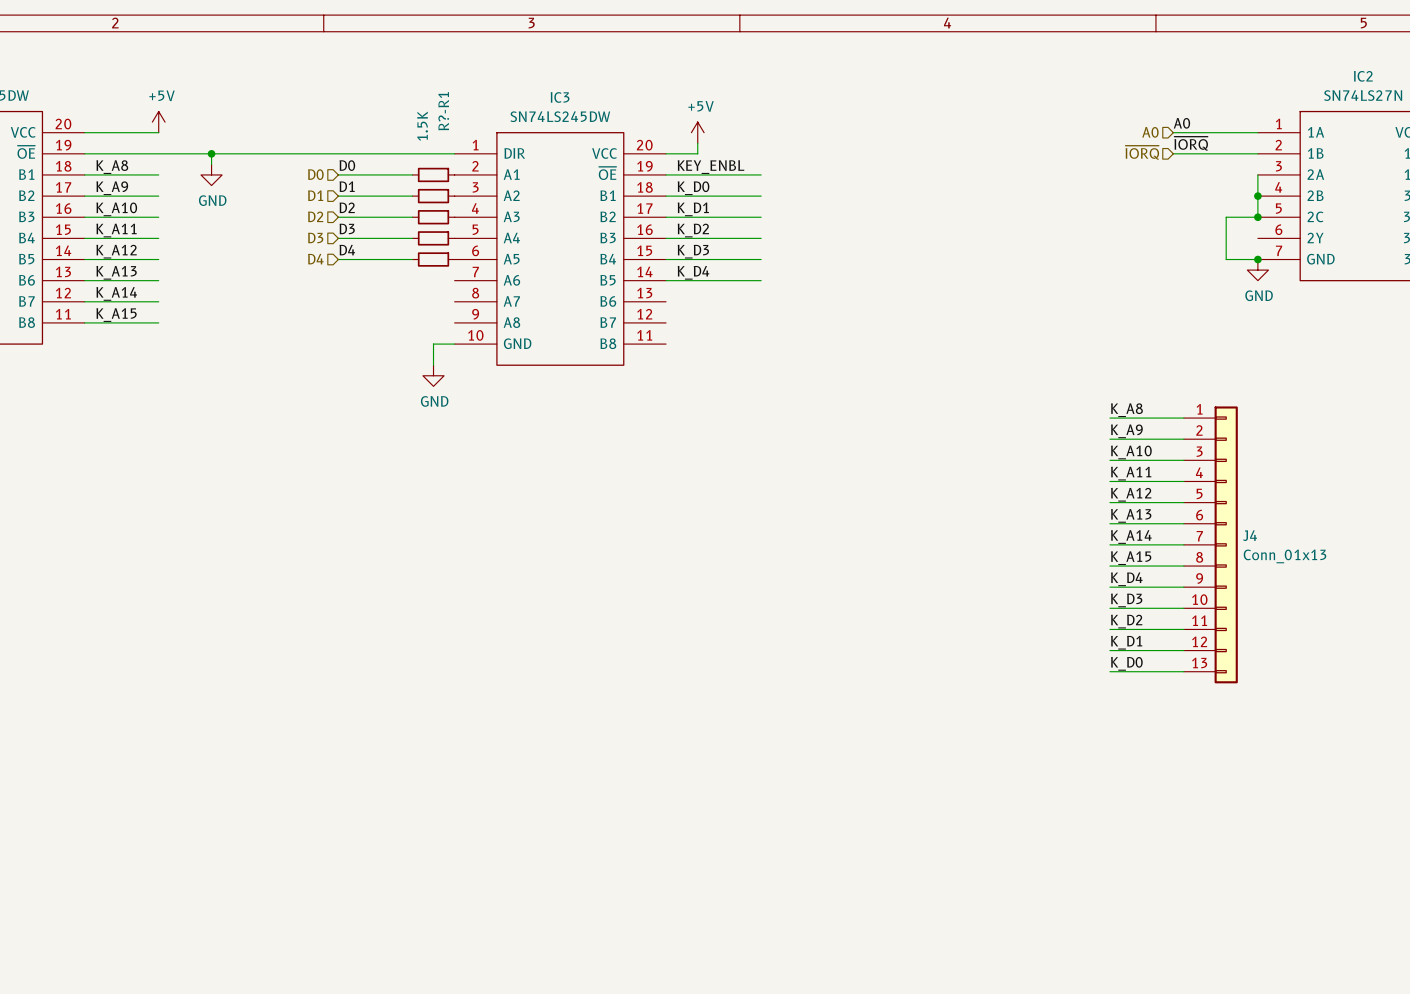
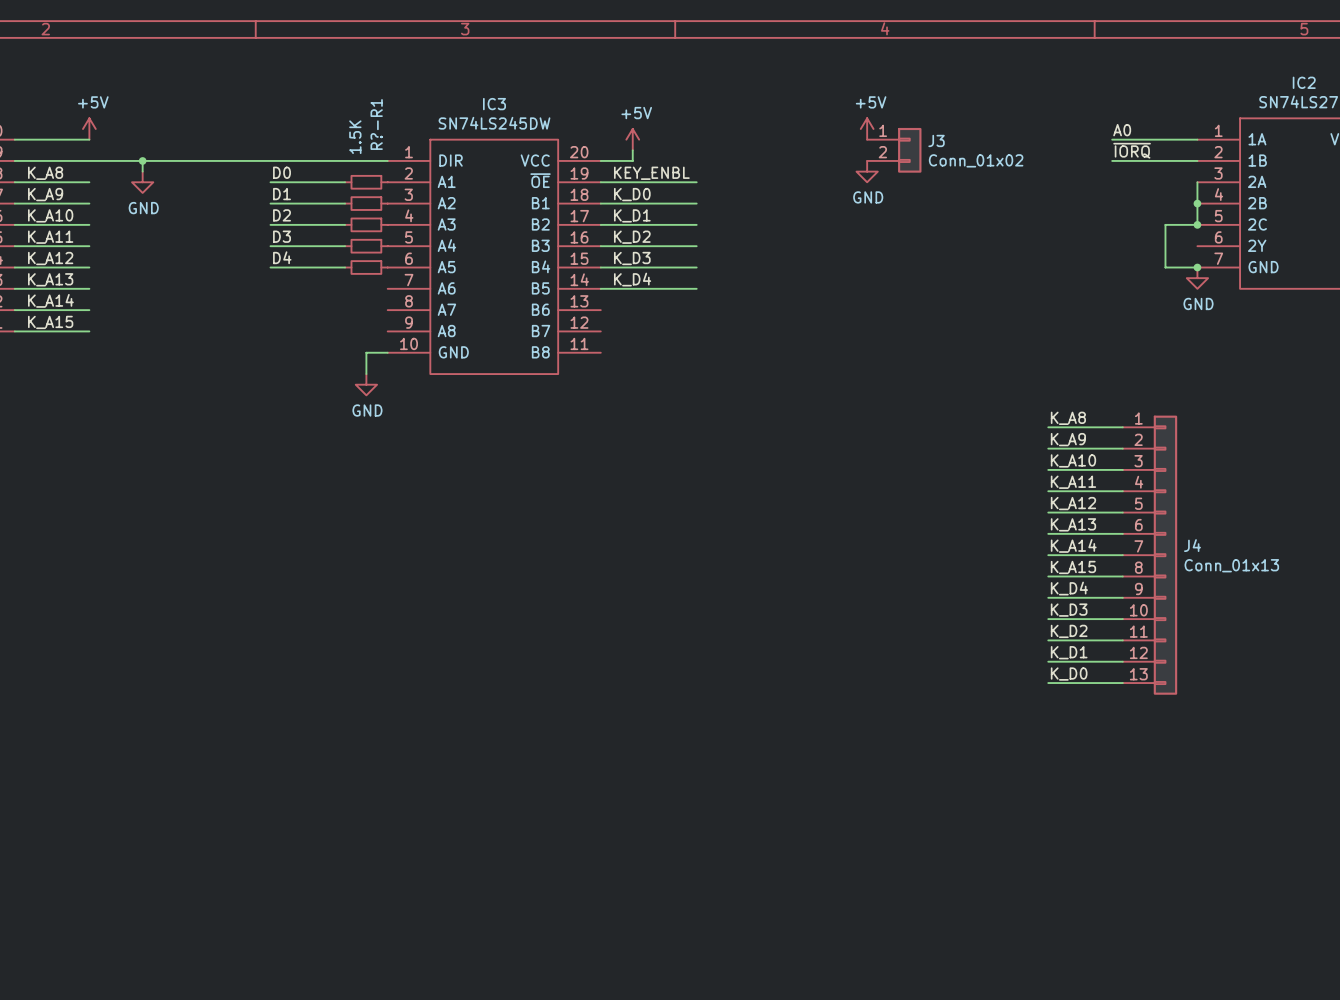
power symbol: none -> +5V (867, 129)
hierarchical label: A0 (1150, 132) -> none
J3: none -> Conn_01x02 (894, 150)
hierarchical label: ~{IORQ} (1142, 152) -> none
power symbol: none -> GND (867, 171)
hierarchical label: D0 (315, 174) -> none
hierarchical label: D1 (315, 195) -> none
hierarchical label: D2 (315, 216) -> none
hierarchical label: D3 (315, 238) -> none
hierarchical label: D4 (315, 259) -> none

